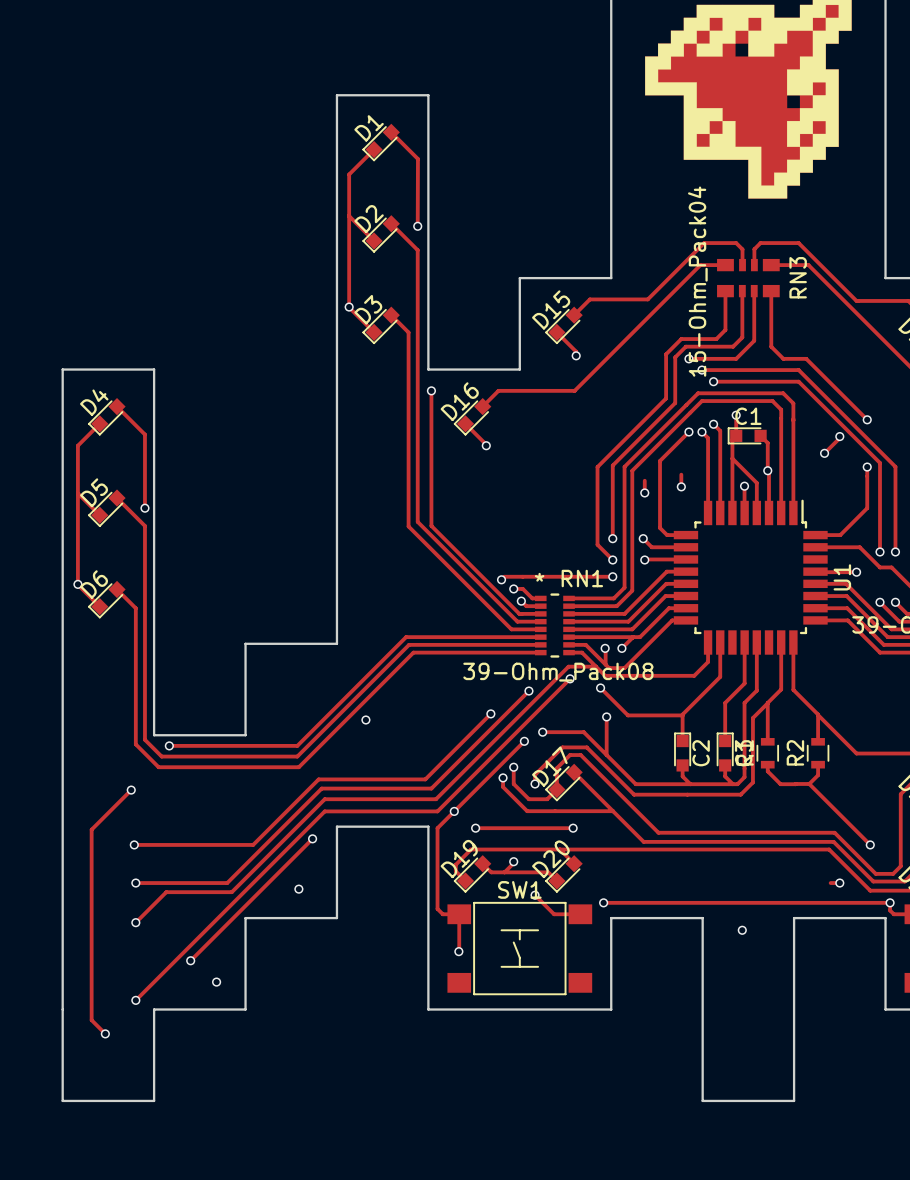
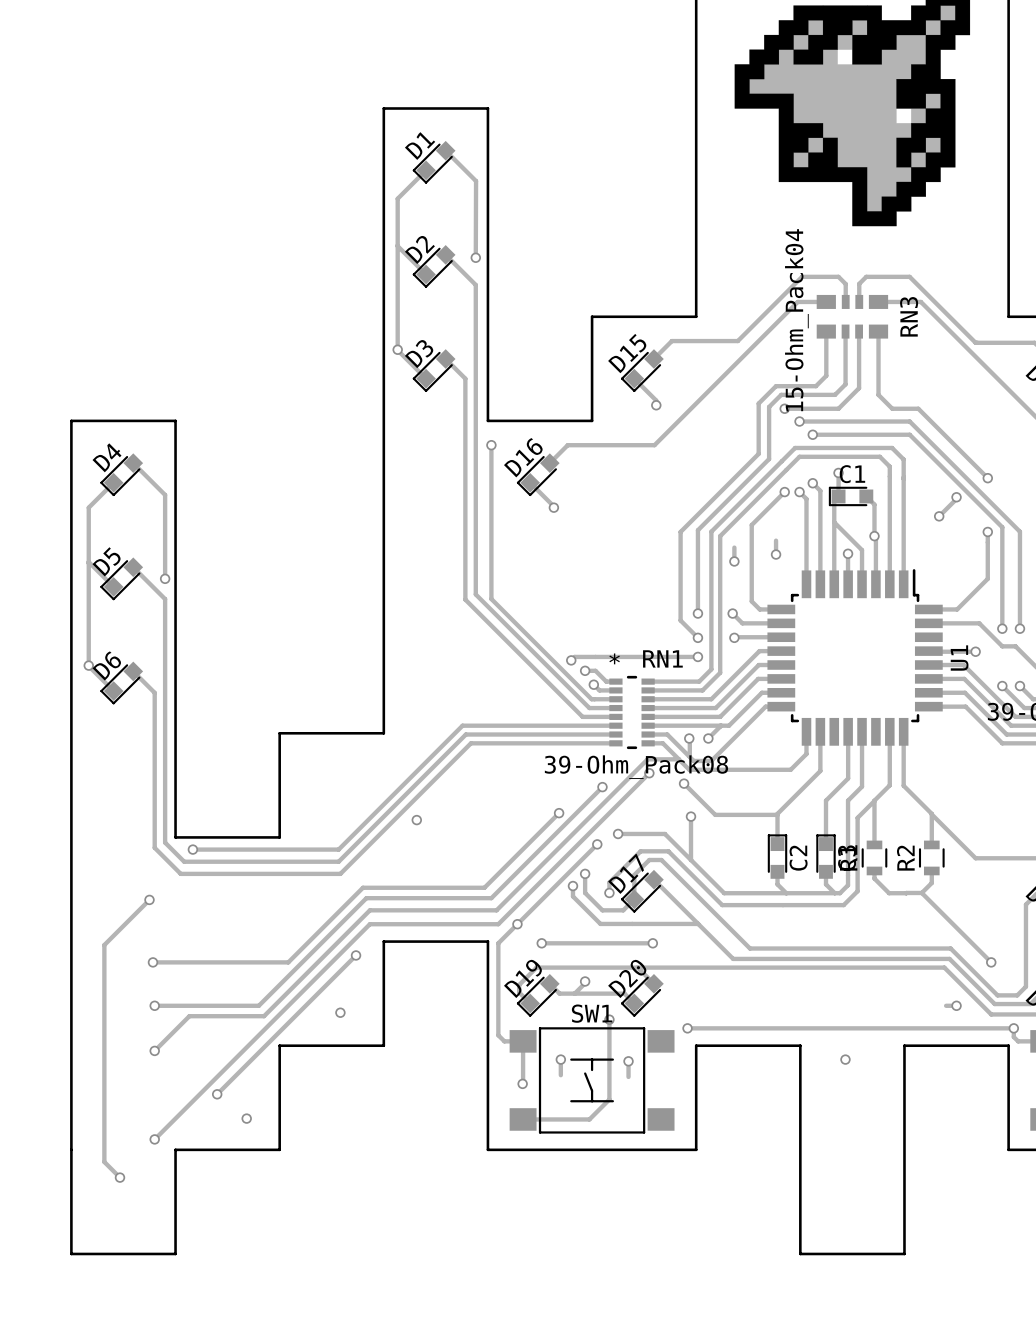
track: (535, 895) (554, 914) (580, 914) -> (609, 1019) (609, 1099) (589, 1119) (523, 1119)
track: none -> (560, 1059) (560, 1075)
via: none -> (560, 1059)
track: none -> (628, 1061) (628, 1076)
via: none -> (628, 1061)

